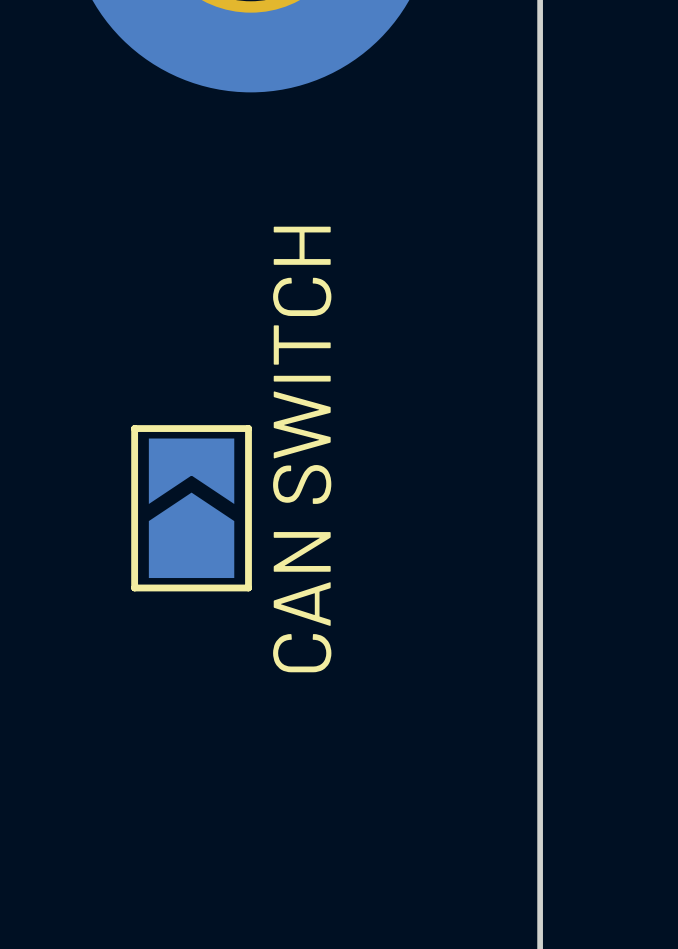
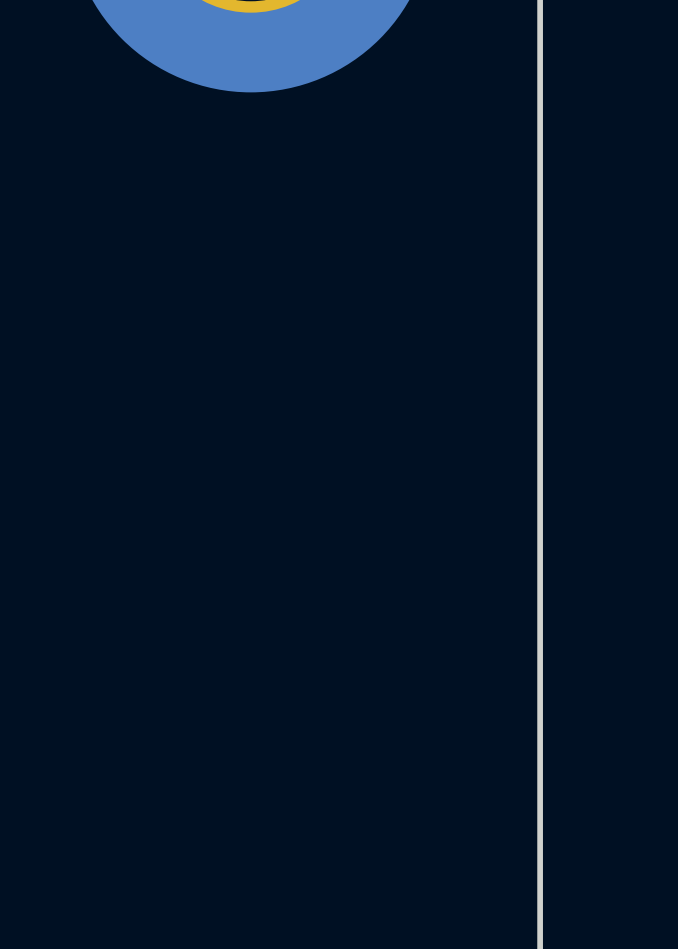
text: CAN SWITCH (302, 449) -> none
part: (191, 508) -> none

